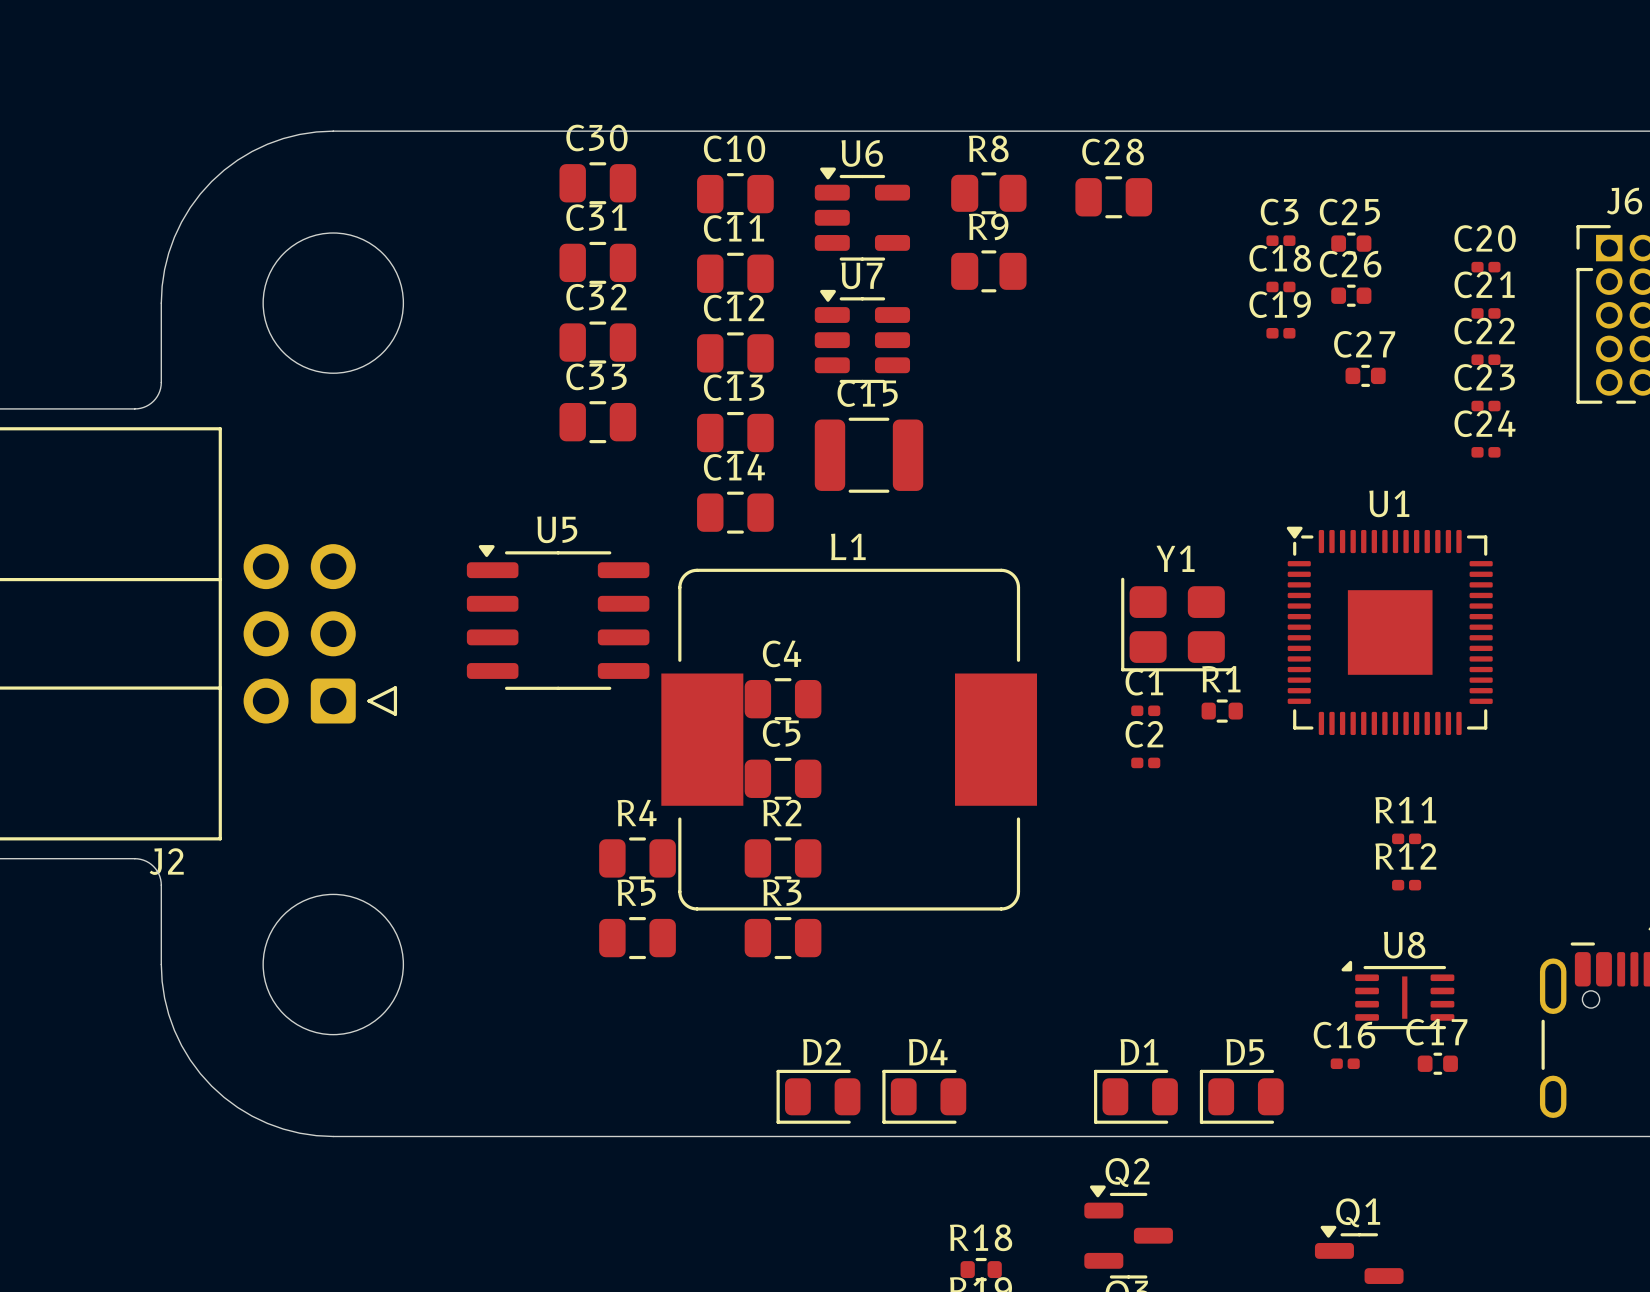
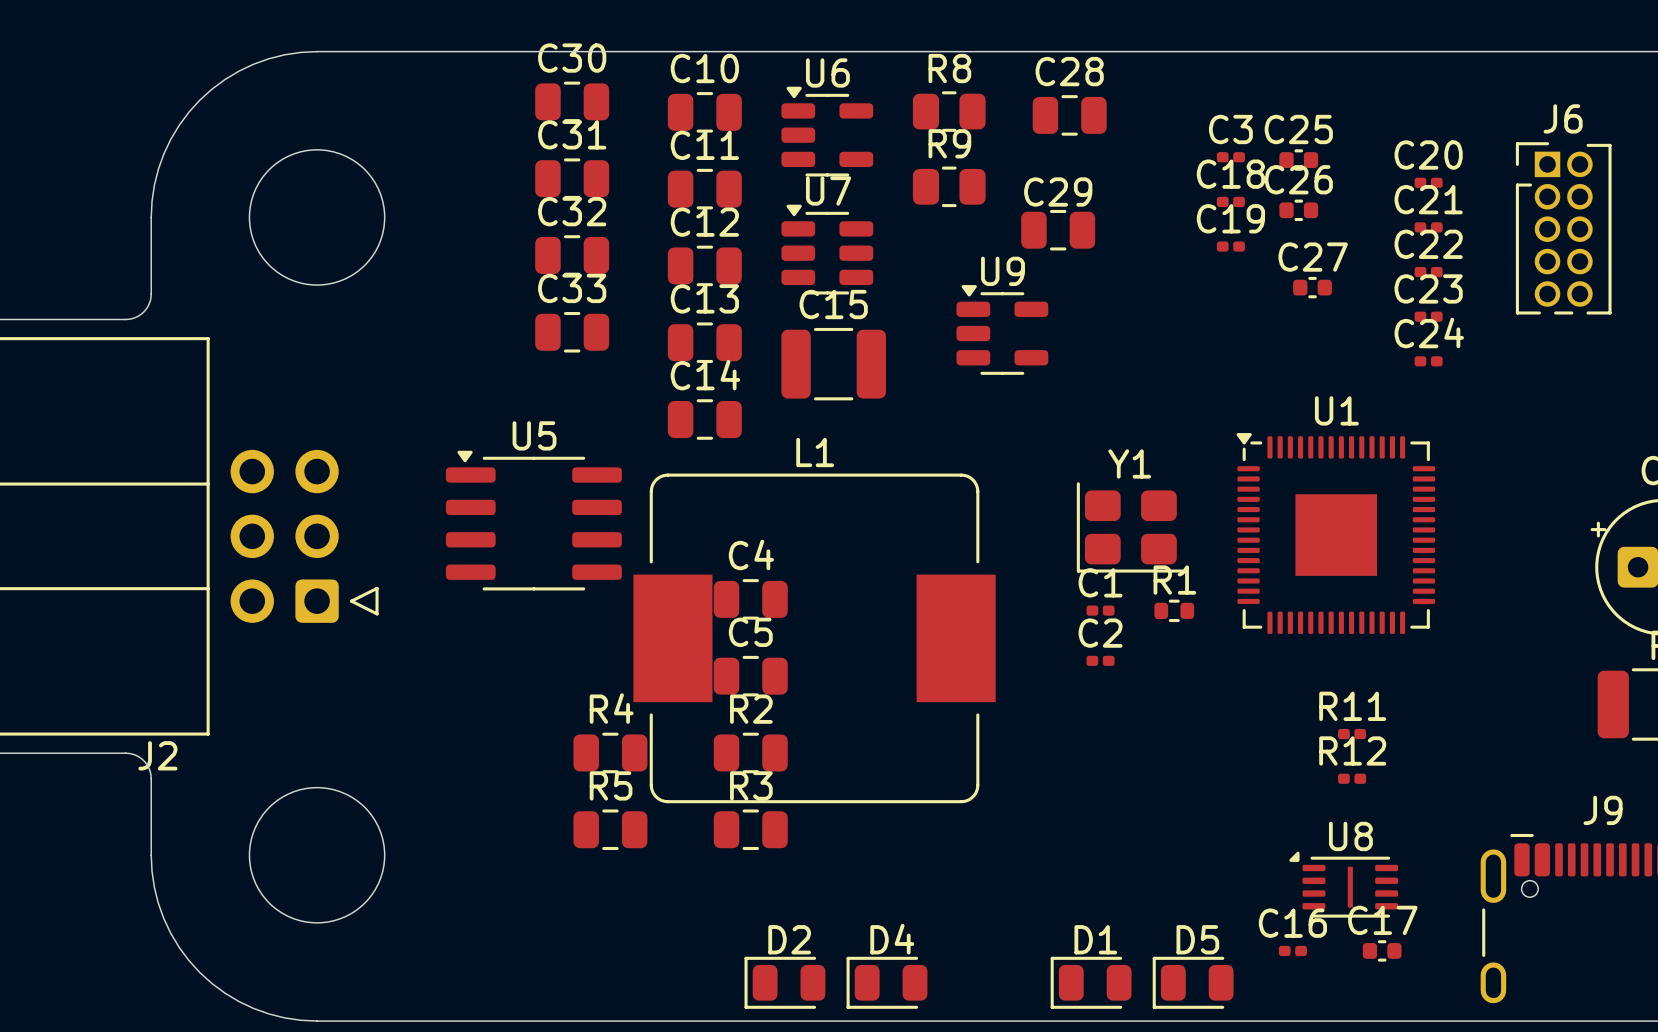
C29: none -> (1058, 230)
U9: none -> (1002, 329)

